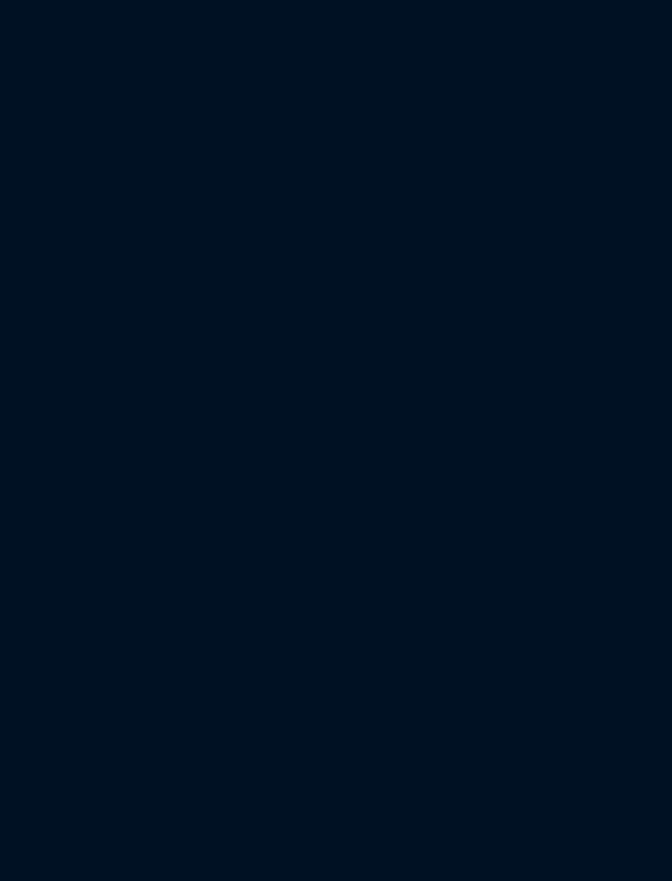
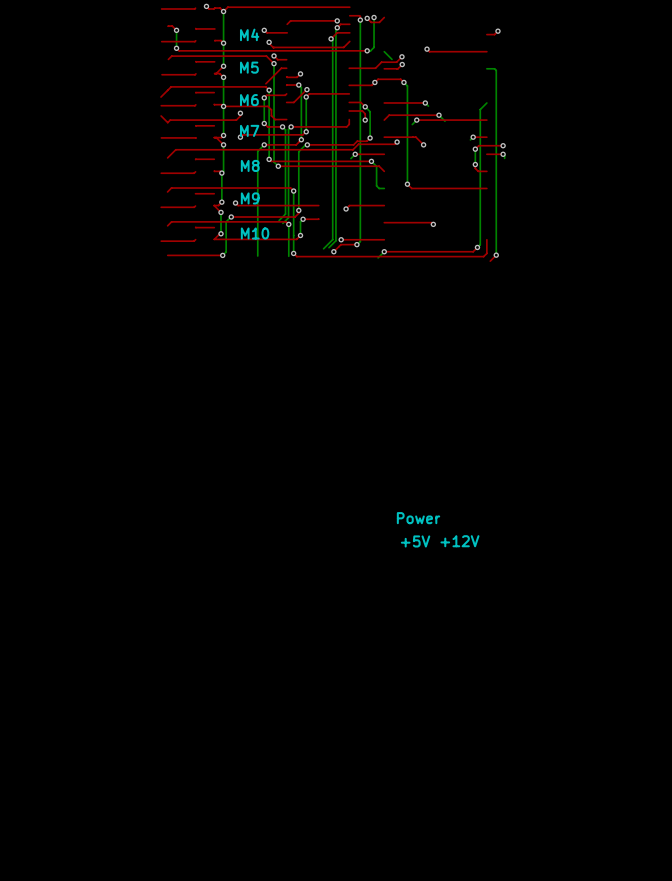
top track: none -> (206, 6) (209, 8) (220, 8) (223, 11) (227, 7) (349, 7)
via: none -> (206, 6)
top track: none -> (195, 8) (161, 8)
bottom track: none -> (223, 11) (223, 66)
via: none -> (223, 11)
top track: none -> (349, 15) (359, 15) (360, 20)
bottom track: none -> (374, 17) (374, 47) (370, 50) (367, 50)
via: none -> (374, 17)
top track: none -> (384, 17) (379, 22) (371, 22) (367, 18)
via: none -> (367, 18)
top track: none -> (337, 20) (290, 20) (287, 24)
via: none -> (337, 20)
bottom track: none -> (360, 20) (360, 241) (356, 244)
via: none -> (360, 20)
top track: none -> (349, 24) (340, 24) (337, 27)
top track: none -> (168, 26) (172, 26) (176, 30)
bottom track: none -> (337, 27) (335, 240) (328, 247)
via: none -> (337, 27)
top track: none -> (195, 28) (214, 28)
bottom track: none -> (176, 30) (176, 48)
via: none -> (176, 30)
top track: none -> (264, 30) (267, 32) (287, 32)
via: none -> (264, 30)
top track: none -> (497, 31) (494, 34) (486, 34)
via: none -> (497, 31)
top track: none -> (349, 32) (337, 32) (331, 38)
text: none -> M4 (249, 34)
bottom track: none -> (331, 38) (332, 40) (332, 239) (323, 248)
via: none -> (331, 38)
top track: none -> (195, 40) (161, 41)
top track: none -> (214, 40) (221, 40) (223, 43)
top track: none -> (349, 41) (343, 47) (273, 47) (269, 42)
via: none -> (269, 42)
via: none -> (223, 43)
top track: none -> (176, 48) (179, 50) (367, 50)
via: none -> (176, 48)
top track: none -> (427, 49) (429, 51) (486, 51)
via: none -> (427, 49)
via: none -> (367, 50)
bottom track: none -> (384, 51) (391, 59)
top track: none -> (274, 55) (277, 59) (286, 59)
via: none -> (274, 55)
top track: none -> (401, 56) (396, 62) (381, 62) (375, 68) (349, 68)
via: none -> (401, 56)
top track: none -> (168, 59) (171, 56) (266, 56) (274, 63)
top track: none -> (195, 61) (214, 61)
bottom track: none -> (274, 63) (274, 161) (278, 166)
via: none -> (274, 63)
top track: none -> (402, 64) (397, 68) (384, 68)
via: none -> (402, 64)
top track: none -> (223, 66) (216, 73)
via: none -> (223, 66)
text: none -> M5 (249, 67)
top track: none -> (286, 68) (281, 68) (265, 83)
bottom track: none -> (486, 68) (496, 70) (496, 255)
top track: none -> (195, 73) (162, 74)
top track: none -> (214, 73) (219, 73) (223, 77)
top track: none -> (300, 73) (297, 77) (286, 76)
via: none -> (300, 73)
bottom track: none -> (223, 77) (223, 135)
via: none -> (223, 77)
via: none -> (374, 82)
top track: none -> (403, 82) (400, 79) (378, 79) (371, 85) (349, 85)
bottom track: none -> (403, 82) (407, 85) (407, 184)
via: none -> (403, 82)
top track: none -> (298, 85) (286, 85)
bottom track: none -> (298, 85) (301, 87) (301, 139)
via: none -> (298, 85)
top track: none -> (306, 89) (293, 102) (286, 102)
via: none -> (306, 89)
top track: none -> (269, 90) (265, 86) (171, 86) (160, 97)
bottom track: none -> (269, 90) (269, 159)
via: none -> (269, 90)
top track: none -> (195, 92) (214, 92)
top track: none -> (286, 93) (266, 95) (264, 97)
top track: none -> (349, 93) (309, 93) (306, 97)
bottom track: none -> (264, 97) (264, 123)
via: none -> (264, 97)
bottom track: none -> (306, 97) (306, 131)
via: none -> (306, 97)
text: none -> M6 (249, 100)
top track: none -> (349, 102) (360, 102) (365, 106)
top track: none -> (384, 102) (425, 102)
bottom track: none -> (425, 102) (428, 106)
via: none -> (425, 102)
bottom track: none -> (486, 102) (480, 109) (480, 244) (477, 247)
top track: none -> (195, 104) (161, 105)
top track: none -> (214, 104) (223, 106) (268, 106) (275, 119) (286, 119)
via: none -> (223, 106)
bottom track: none -> (365, 106) (370, 111) (370, 138)
via: none -> (365, 106)
top track: none -> (349, 111) (362, 111) (365, 113) (365, 120)
top track: none -> (240, 113) (236, 120) (170, 120) (167, 122) (161, 115)
via: none -> (240, 113)
top track: none -> (438, 115) (389, 115) (384, 120)
bottom track: none -> (438, 115) (444, 121)
via: none -> (438, 115)
top track: none -> (349, 119) (349, 124) (346, 126) (291, 126)
via: none -> (365, 120)
top track: none -> (416, 120) (486, 120)
bottom track: none -> (416, 120) (412, 124)
via: none -> (416, 120)
top track: none -> (264, 123) (267, 126) (282, 126)
via: none -> (264, 123)
top track: none -> (195, 125) (214, 125)
bottom track: none -> (282, 126) (285, 129) (285, 214) (279, 220)
via: none -> (282, 126)
bottom track: none -> (291, 126) (288, 129) (288, 217) (282, 223)
via: none -> (291, 126)
text: none -> M7 (249, 130)
top track: none -> (306, 131) (302, 134) (242, 134) (240, 137)
via: none -> (306, 131)
top track: none -> (223, 135) (221, 137) (214, 137)
via: none -> (223, 135)
top track: none -> (161, 137) (195, 138)
top track: none -> (216, 137) (223, 144)
via: none -> (240, 137)
top track: none -> (384, 137) (415, 137) (423, 144)
top track: none -> (473, 137) (486, 137)
bottom track: none -> (473, 137) (470, 139)
via: none -> (473, 137)
top track: none -> (370, 138) (366, 141) (357, 141) (353, 144) (307, 144)
via: none -> (370, 138)
top track: none -> (301, 139) (296, 144) (264, 144)
via: none -> (301, 139)
top track: none -> (397, 142) (394, 144) (358, 144) (353, 149) (175, 149) (167, 157)
via: none -> (397, 142)
bottom track: none -> (223, 144) (221, 202)
via: none -> (223, 144)
bottom track: none -> (264, 144) (257, 151) (257, 256)
via: none -> (264, 144)
bottom track: none -> (307, 144) (298, 151) (298, 210)
via: none -> (307, 144)
via: none -> (423, 144)
top track: none -> (503, 145) (478, 145) (475, 149)
via: none -> (503, 145)
bottom track: none -> (475, 149) (475, 164)
via: none -> (475, 149)
top track: none -> (355, 154) (384, 154)
bottom track: none -> (355, 154) (350, 158)
via: none -> (355, 154)
top track: none -> (486, 154) (503, 154)
bottom track: none -> (503, 154) (504, 158)
via: none -> (503, 154)
top track: none -> (214, 159) (195, 159)
top track: none -> (269, 159) (271, 161) (371, 161)
via: none -> (269, 159)
bottom track: none -> (371, 161) (376, 166) (376, 185) (379, 188) (384, 188)
via: none -> (371, 161)
top track: none -> (475, 164) (475, 168) (478, 171) (486, 171)
via: none -> (475, 164)
text: none -> M8 (250, 165)
top track: none -> (278, 166) (379, 166) (384, 171)
via: none -> (278, 166)
top track: none -> (195, 171) (161, 173)
top track: none -> (214, 171) (221, 173)
via: none -> (221, 173)
top track: none -> (407, 184) (411, 188) (486, 188)
via: none -> (407, 184)
top track: none -> (293, 191) (290, 188) (171, 188) (167, 191)
bottom track: none -> (293, 191) (293, 253)
via: none -> (293, 191)
top track: none -> (195, 193) (214, 193)
text: none -> M9 (250, 198)
top track: none -> (221, 202) (218, 205) (214, 205)
via: none -> (221, 202)
top track: none -> (235, 203) (238, 205) (318, 205)
via: none -> (235, 203)
top track: none -> (214, 205) (221, 212)
top track: none -> (384, 205) (349, 205) (346, 208)
top track: none -> (195, 206) (161, 207)
via: none -> (346, 208)
top track: none -> (298, 210) (295, 217) (231, 217)
via: none -> (298, 210)
bottom track: none -> (221, 212) (221, 233)
via: none -> (221, 212)
bottom track: none -> (231, 217) (226, 221) (226, 251) (222, 255)
via: none -> (231, 217)
bottom track: none -> (303, 219) (300, 221) (300, 235)
via: none -> (303, 219)
top track: none -> (318, 219) (303, 219)
top track: none -> (384, 222) (431, 222) (433, 224)
top track: none -> (288, 224) (286, 221) (171, 221) (167, 225)
bottom track: none -> (288, 224) (288, 256)
via: none -> (288, 224)
via: none -> (433, 224)
top track: none -> (195, 227) (214, 227)
top track: none -> (221, 233) (214, 239) (296, 239) (300, 235)
via: none -> (221, 233)
text: none -> M10 (255, 233)
via: none -> (300, 235)
top track: none -> (195, 239) (161, 241)
top track: none -> (341, 239) (384, 239)
via: none -> (341, 239)
top track: none -> (486, 239) (486, 253) (483, 256) (296, 256) (293, 253)
top track: none -> (356, 244) (340, 244) (333, 251)
via: none -> (356, 244)
top track: none -> (477, 247) (473, 251) (384, 251)
via: none -> (477, 247)
via: none -> (333, 251)
bottom track: none -> (384, 251) (378, 257)
via: none -> (384, 251)
via: none -> (293, 253)
top track: none -> (167, 255) (222, 255)
via: none -> (222, 255)
top track: none -> (496, 255) (490, 261)
via: none -> (496, 255)
text: none -> Power (418, 518)
text: none -> +5V (415, 541)
text: none -> +12V (459, 541)

